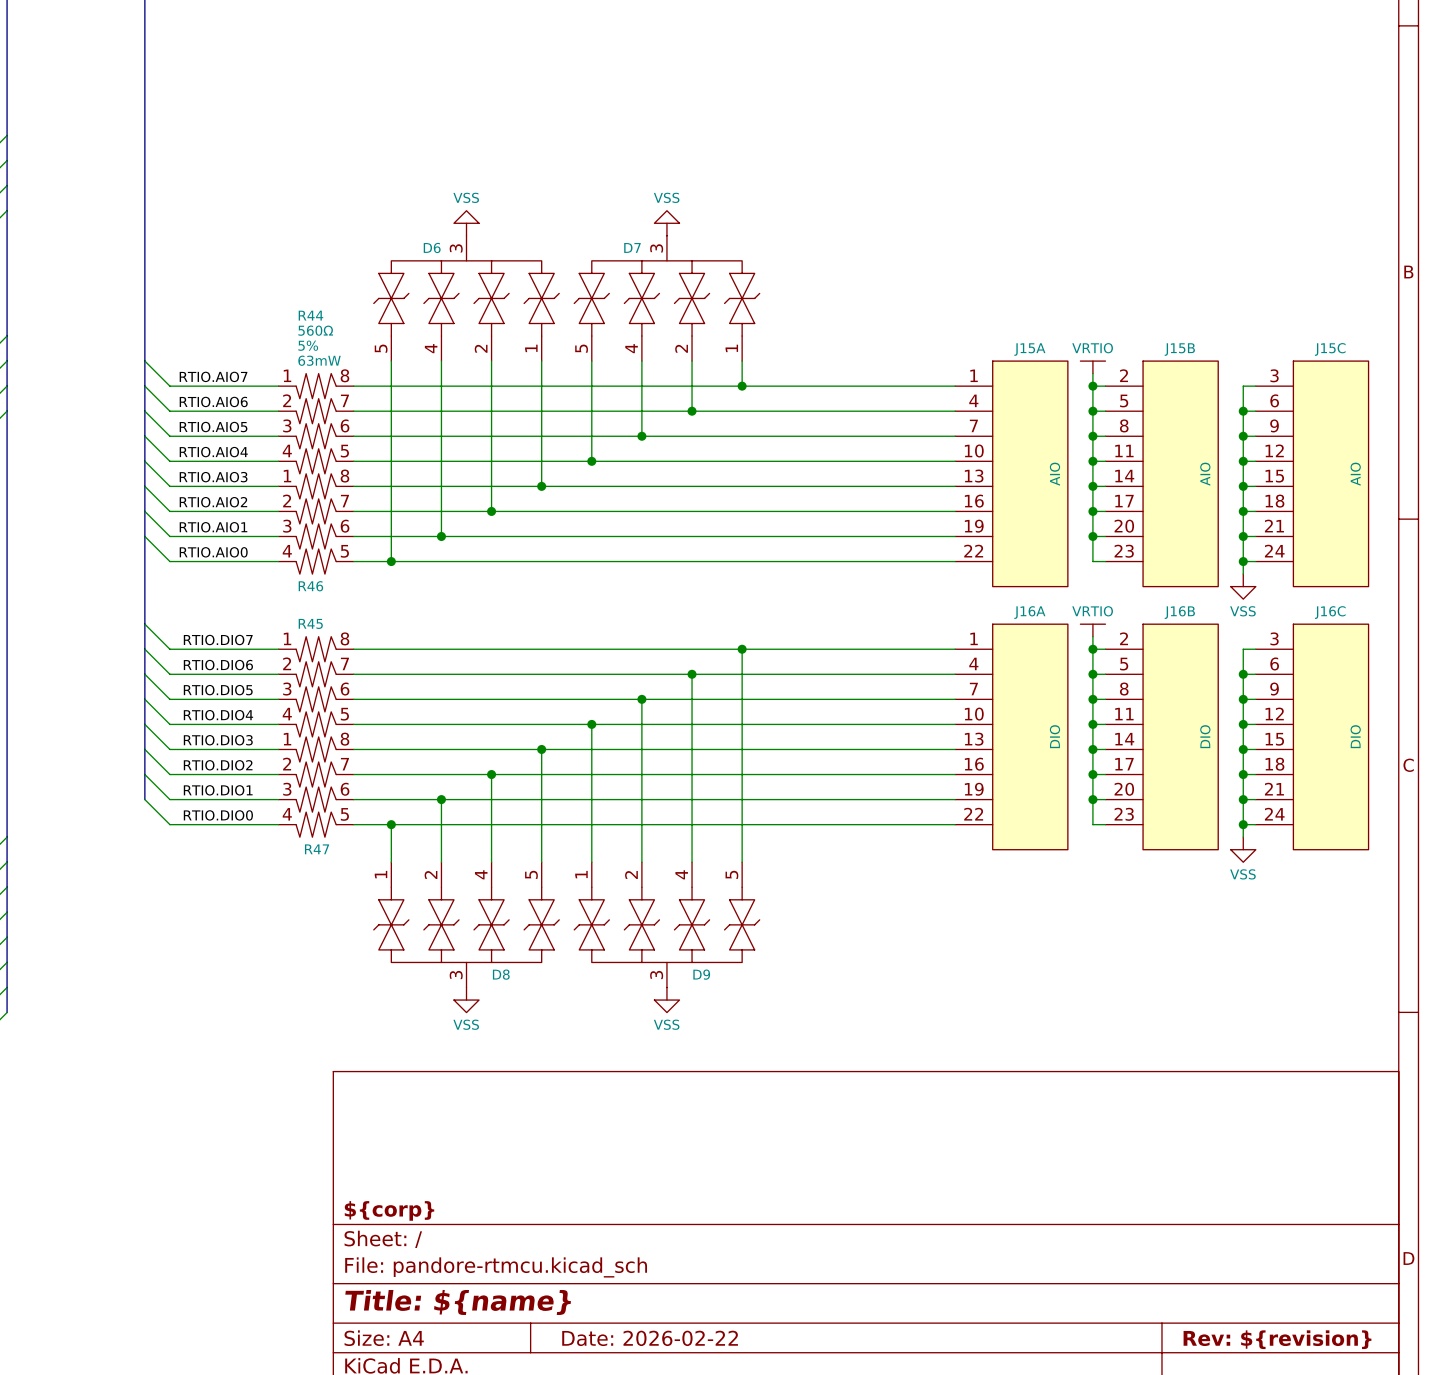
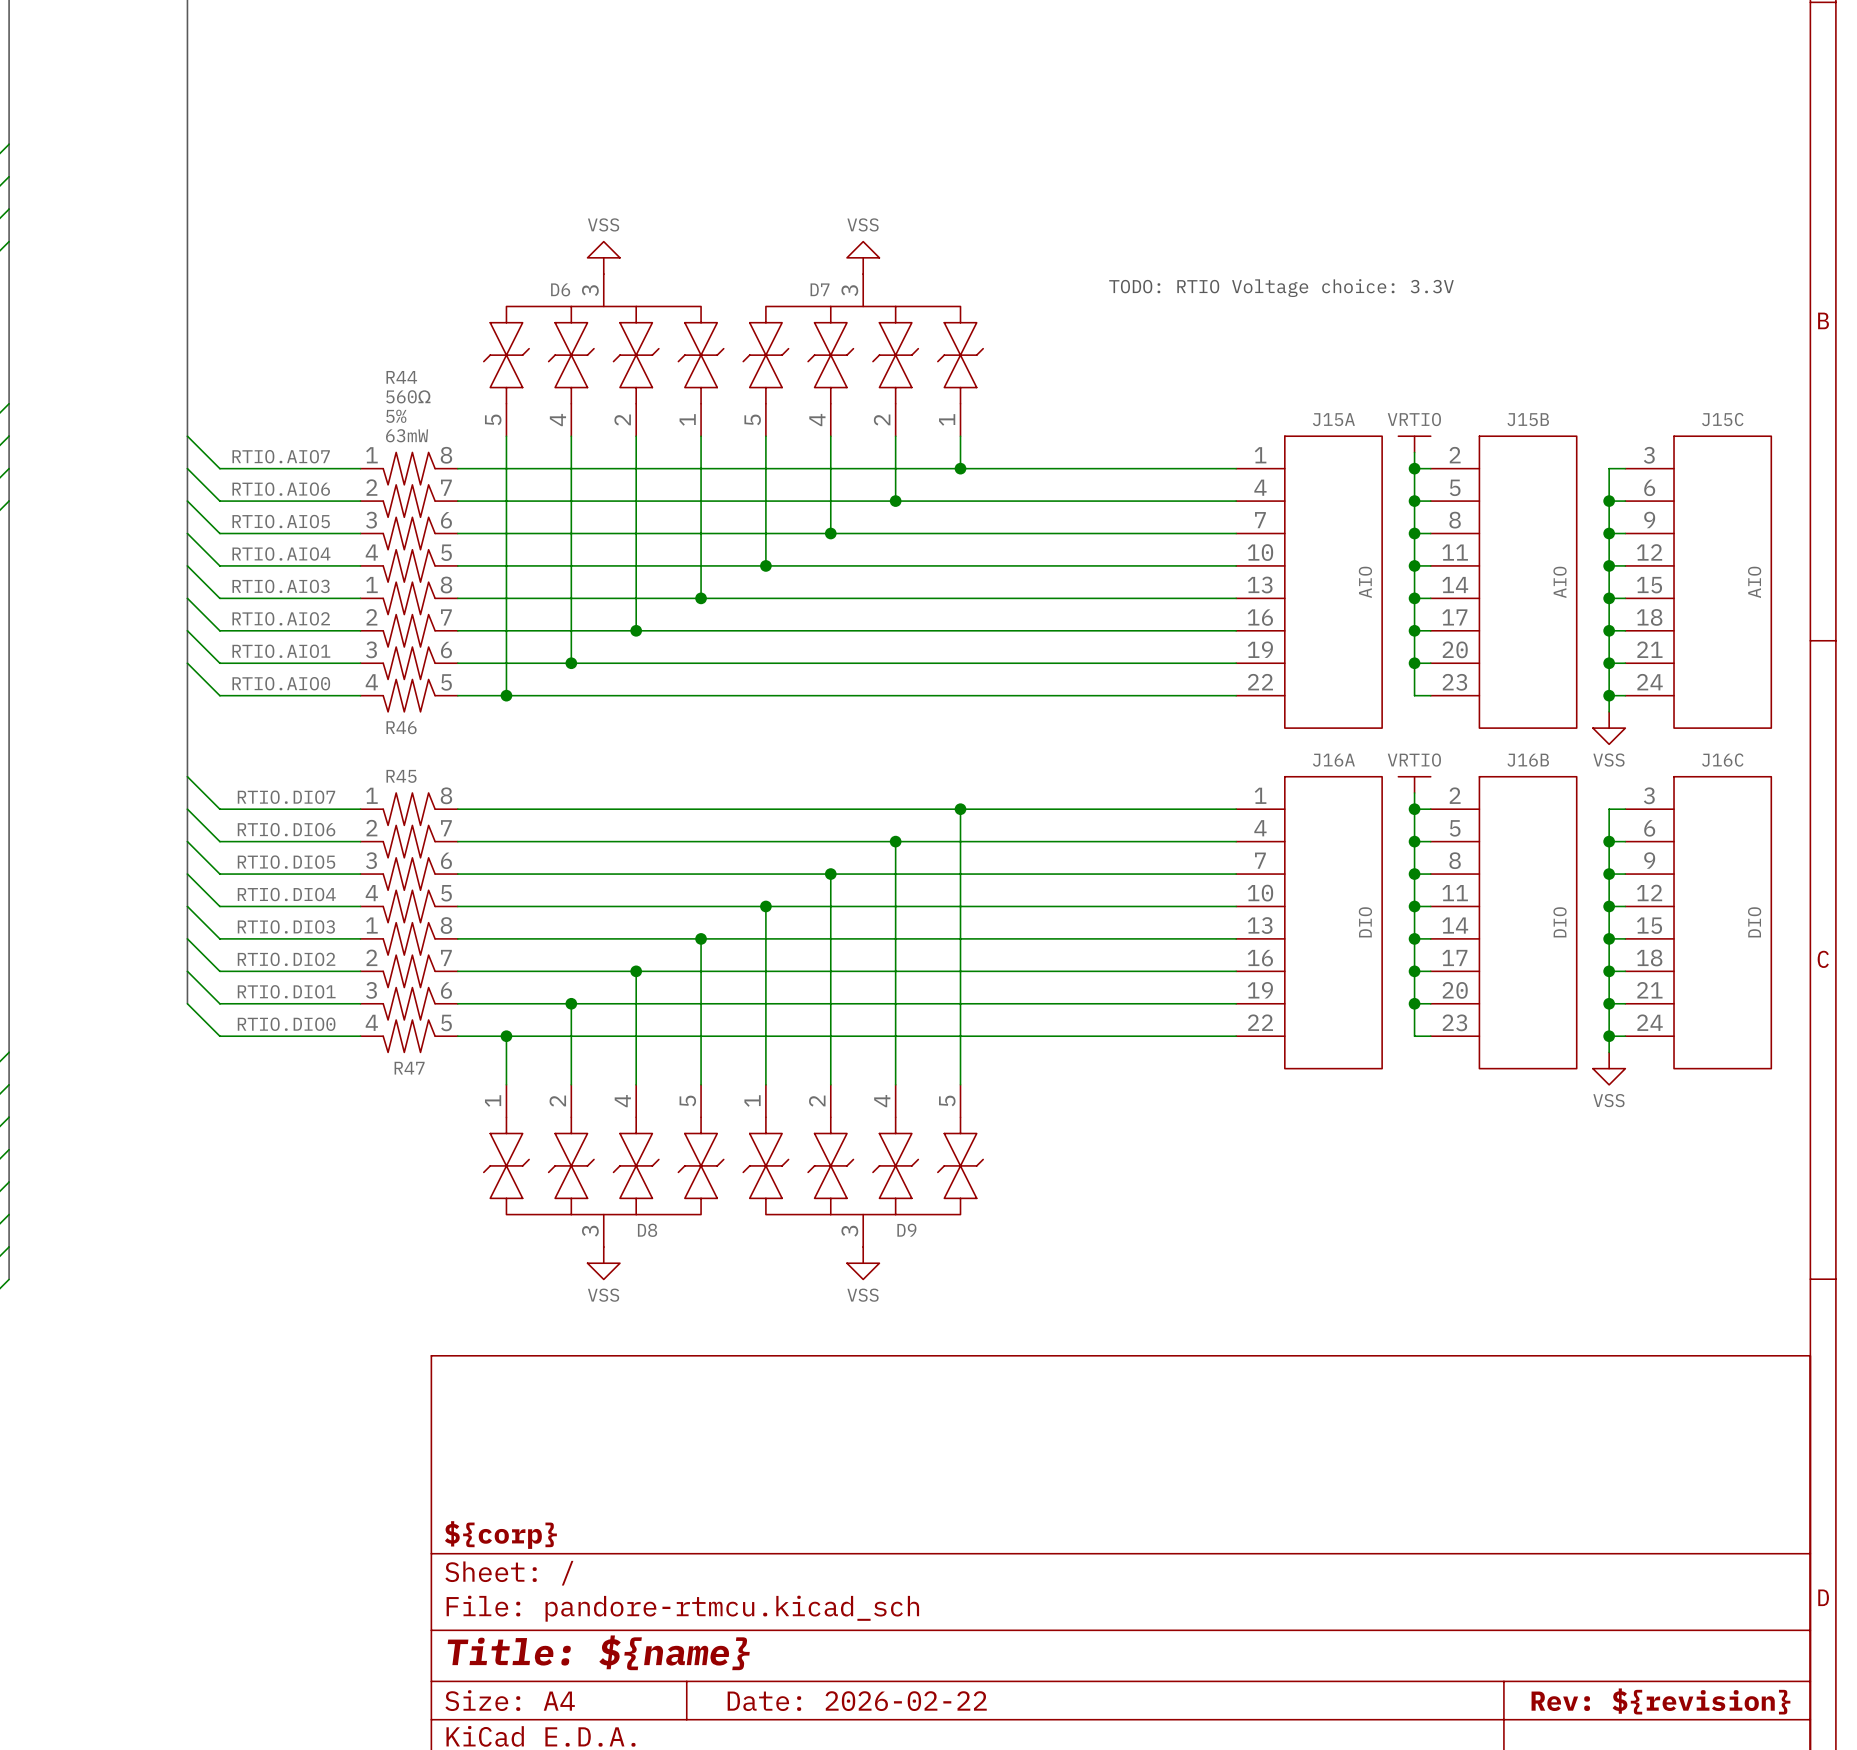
text: none -> TODO: RTIO Voltage choice: 3.3V (1281, 288)

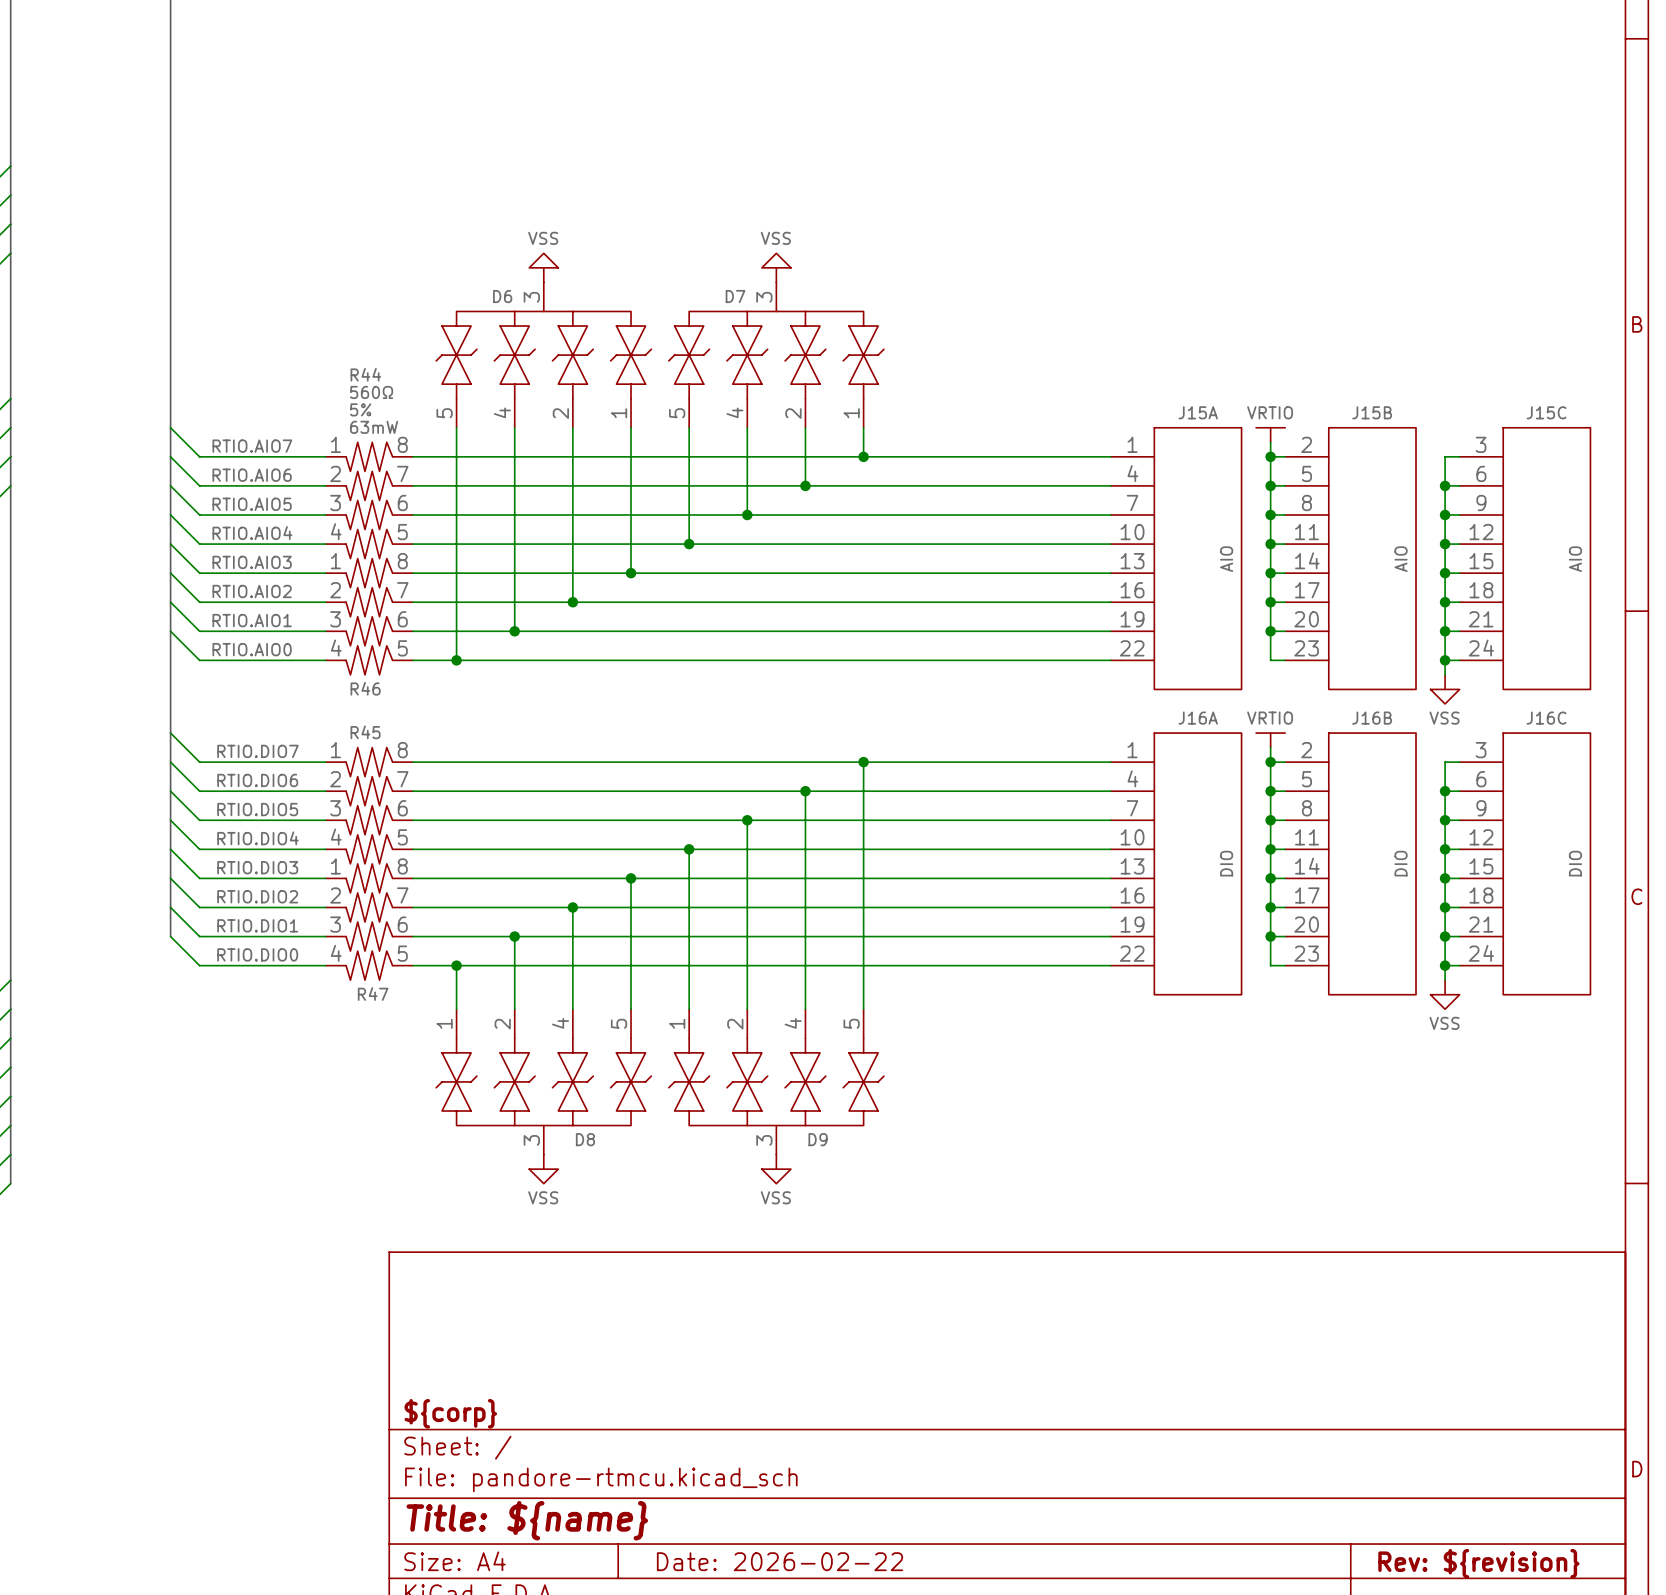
text: TODO: RTIO Voltage choice: 3.3V (1281, 288) -> none

